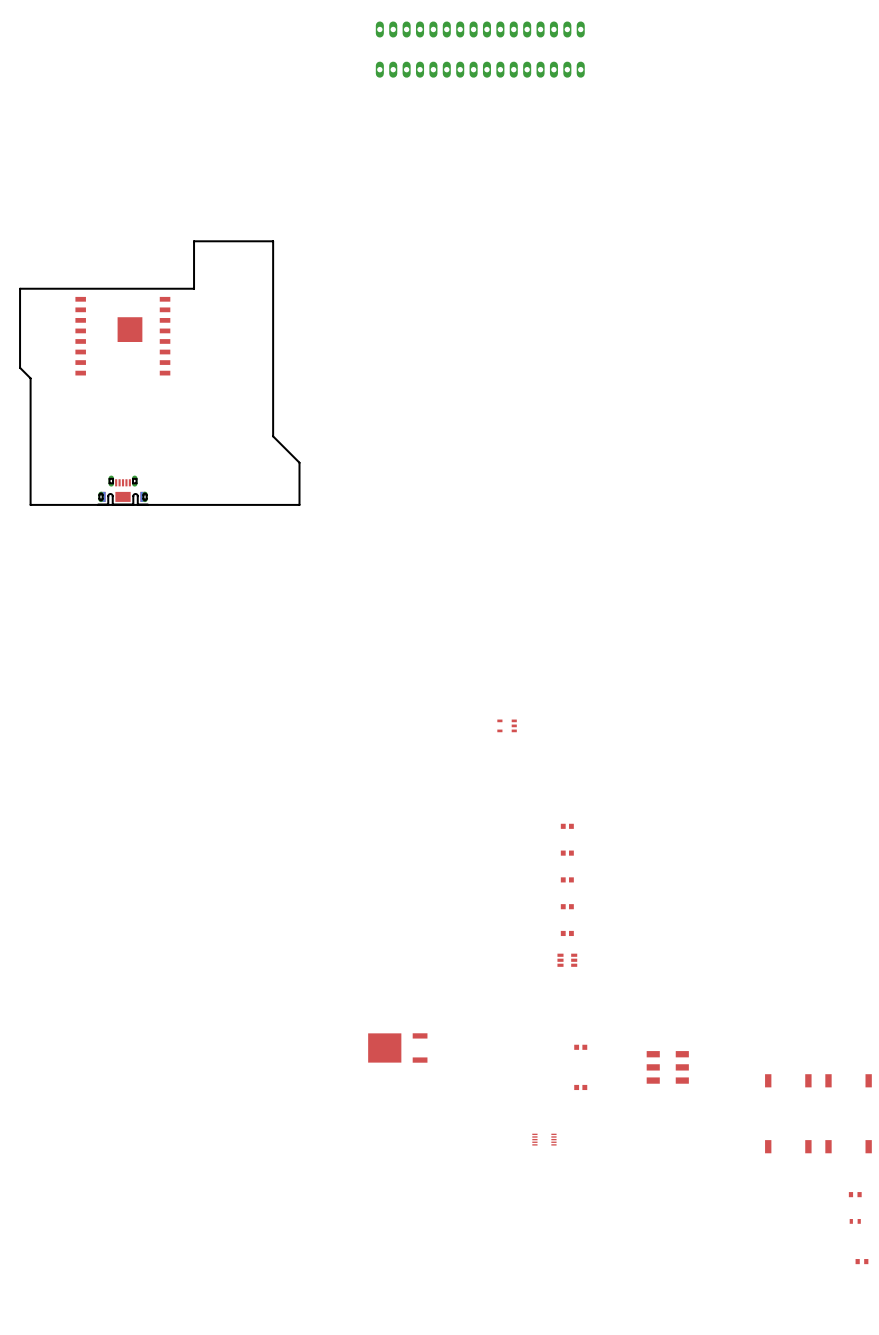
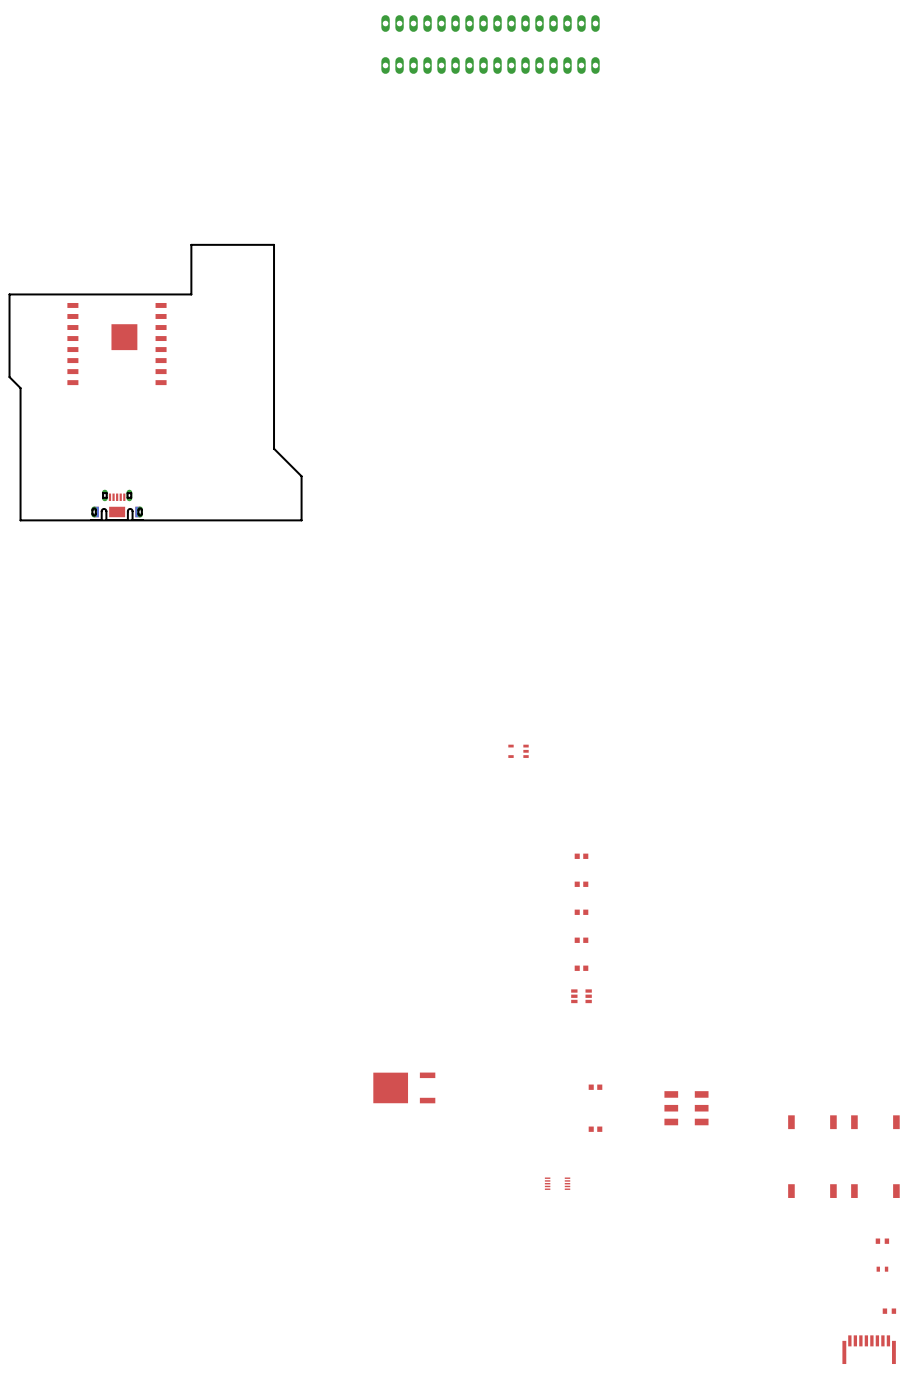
part: none -> (869, 1349)

